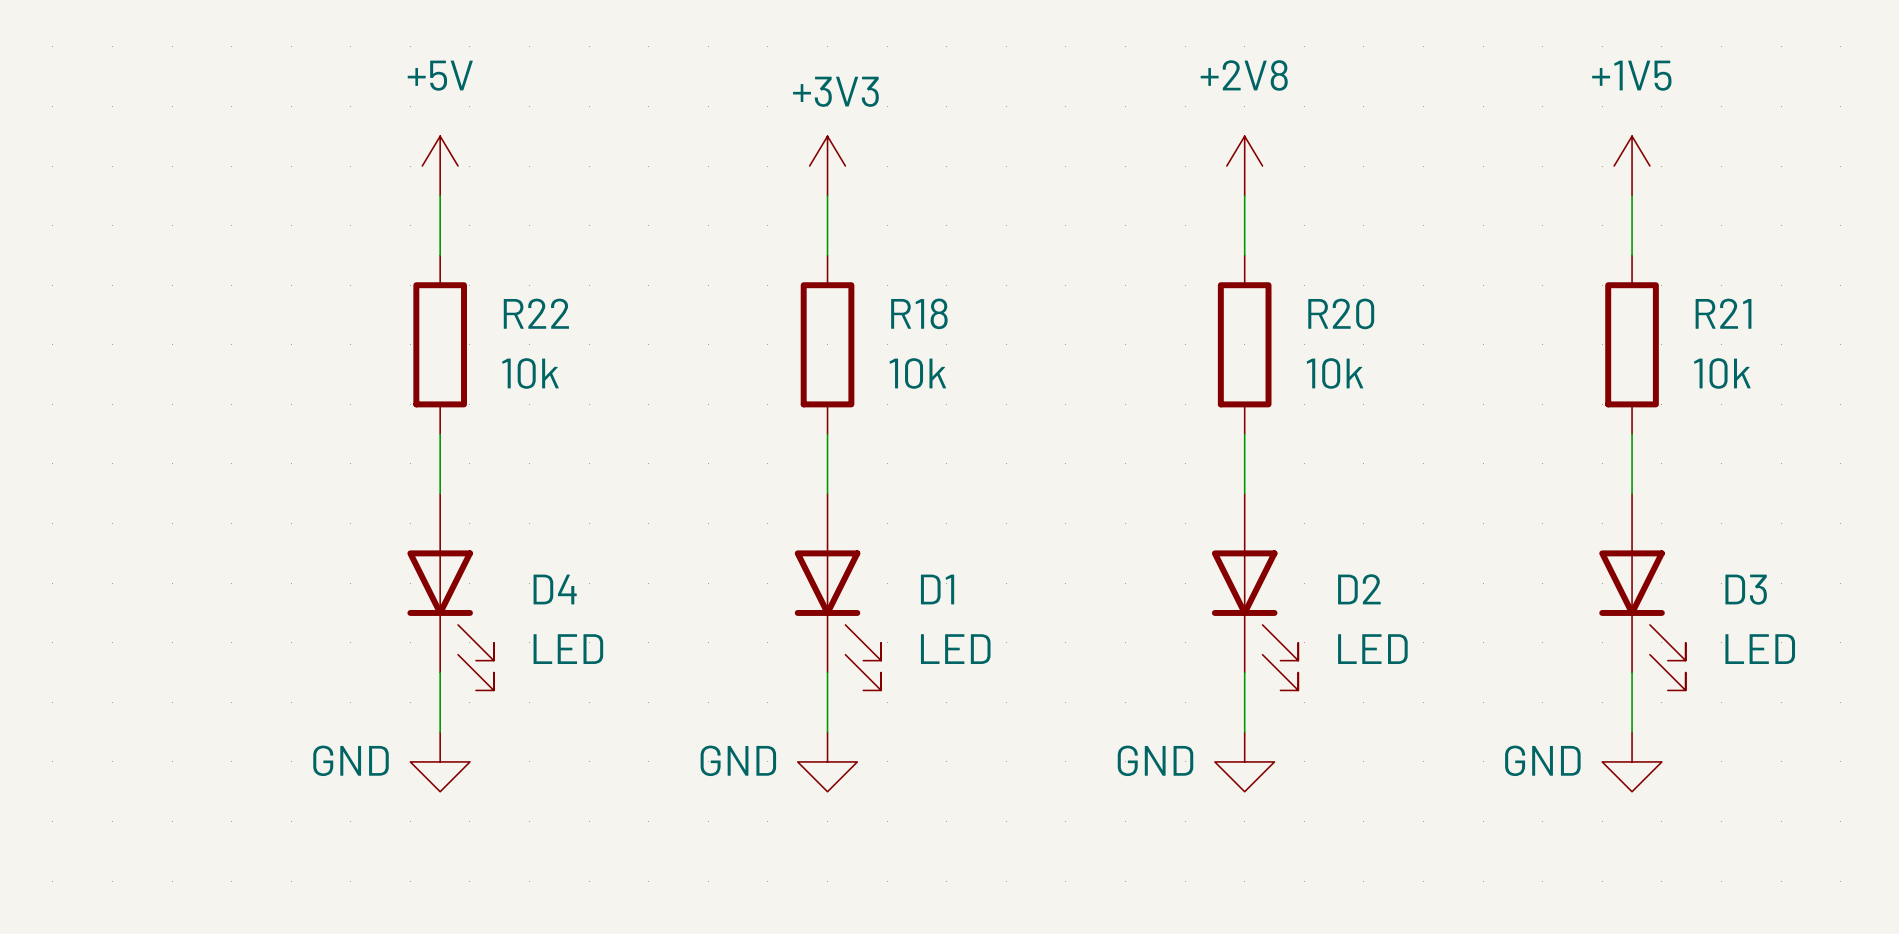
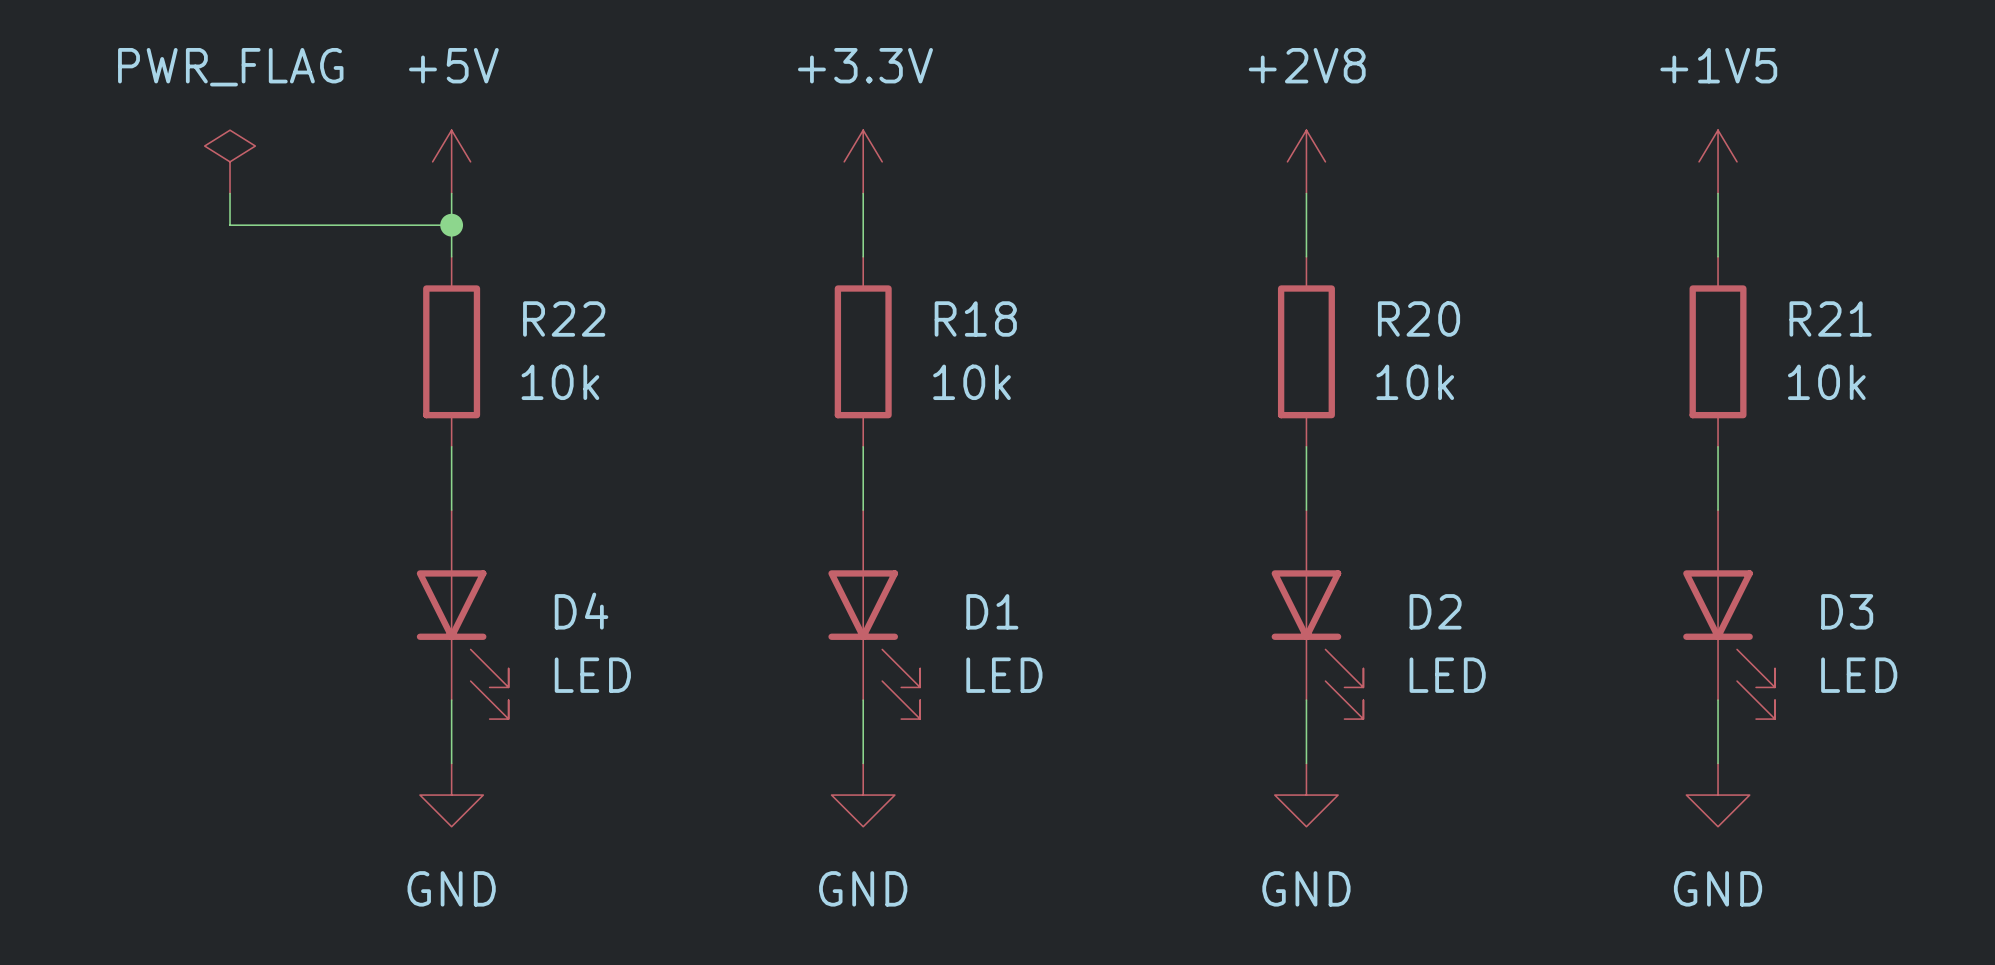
power symbol: none -> PWR_FLAG (230, 161)
power symbol: +3V3 (827, 166) -> +3.3V (863, 161)
wire: none -> (230, 193) (230, 225) (451, 225)
junction: none -> (451, 225)
power symbol text position: GND (350, 760) -> GND (451, 888)
power symbol text position: GND (738, 760) -> GND (863, 888)
power symbol text position: GND (1155, 760) -> GND (1306, 888)
power symbol text position: GND (1542, 760) -> GND (1718, 888)

